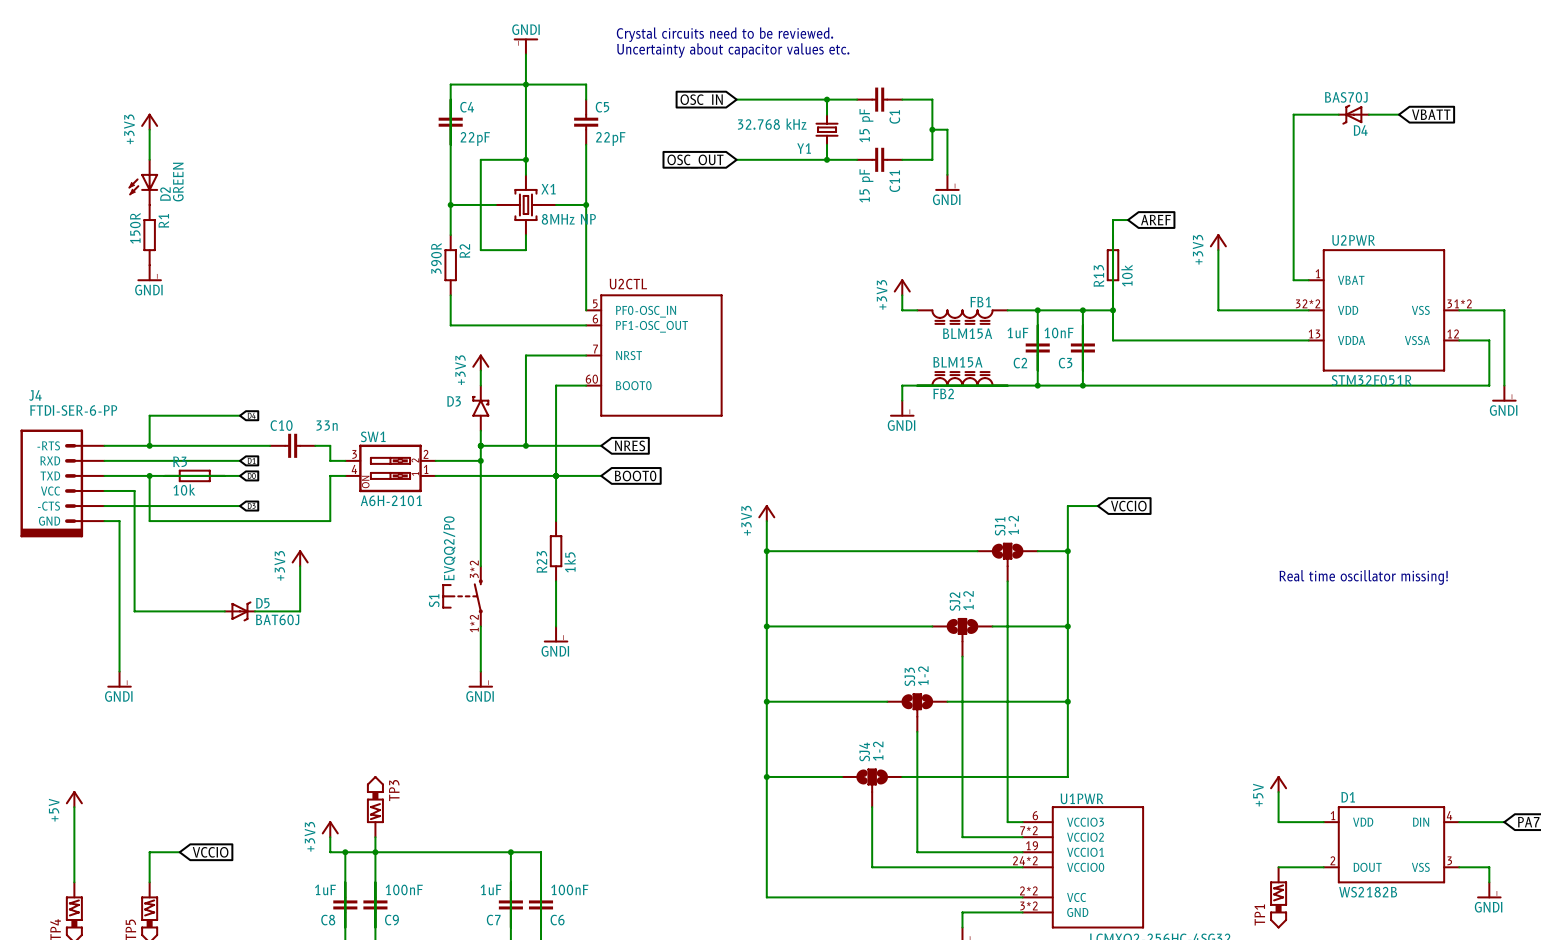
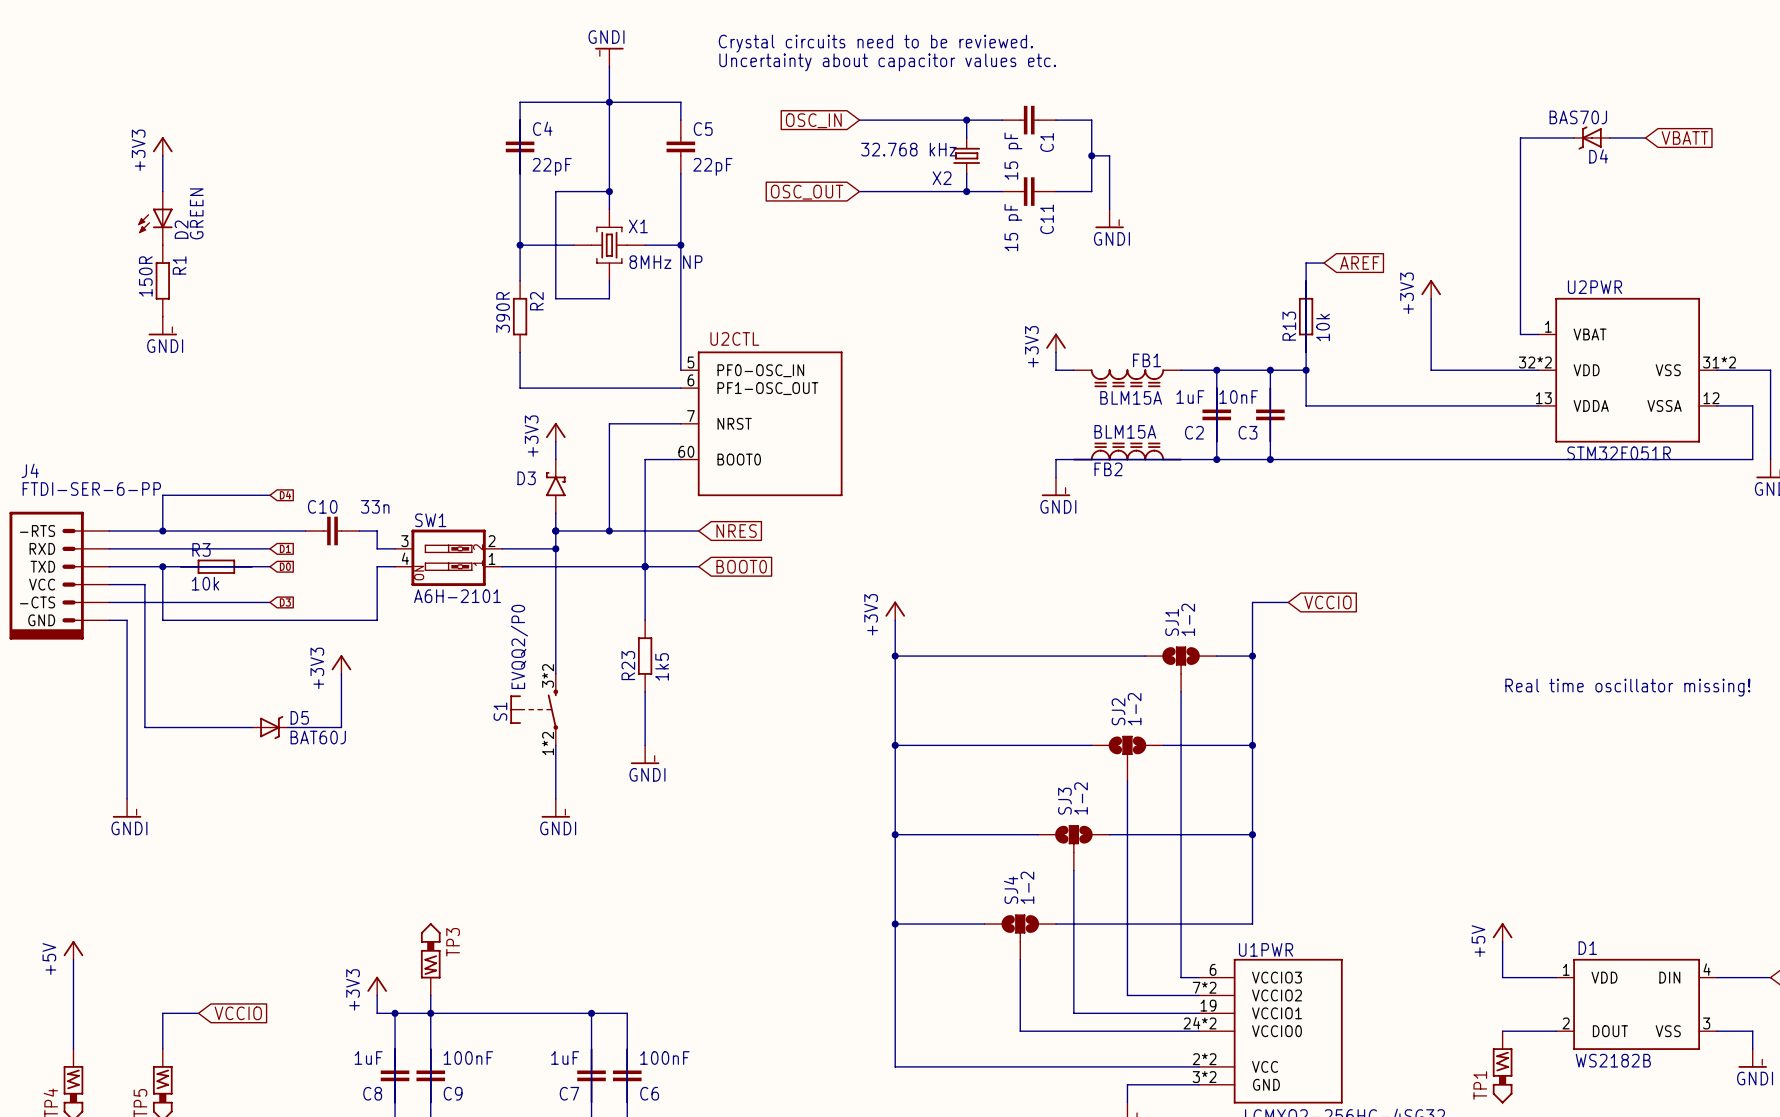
Y1 name: Y1 (804, 148) -> X2 (942, 178)

